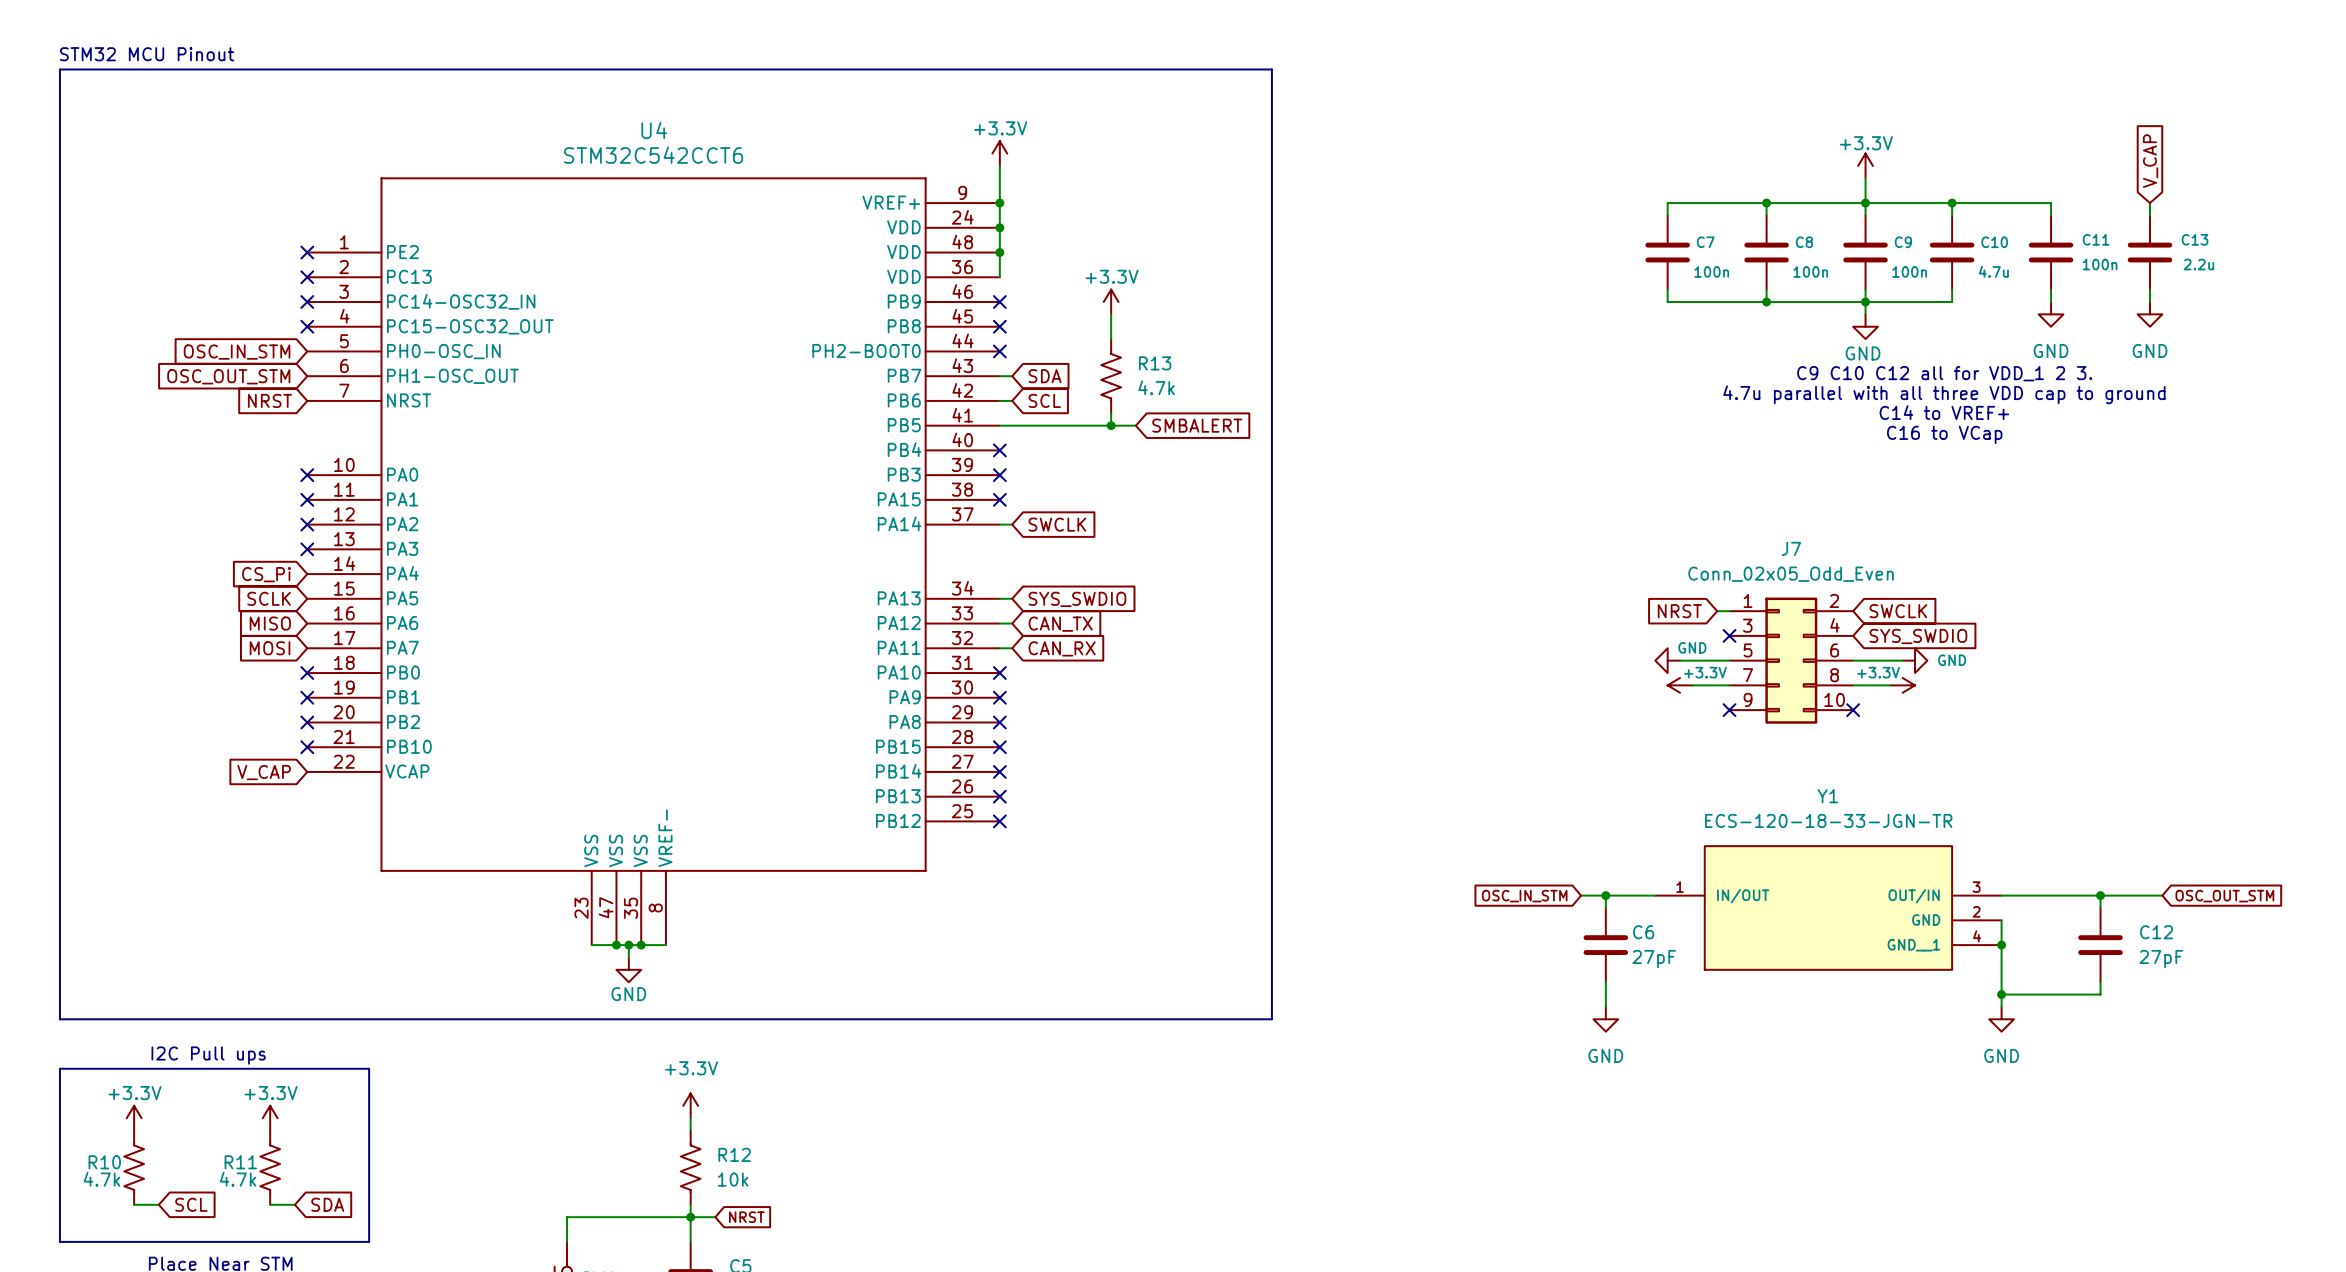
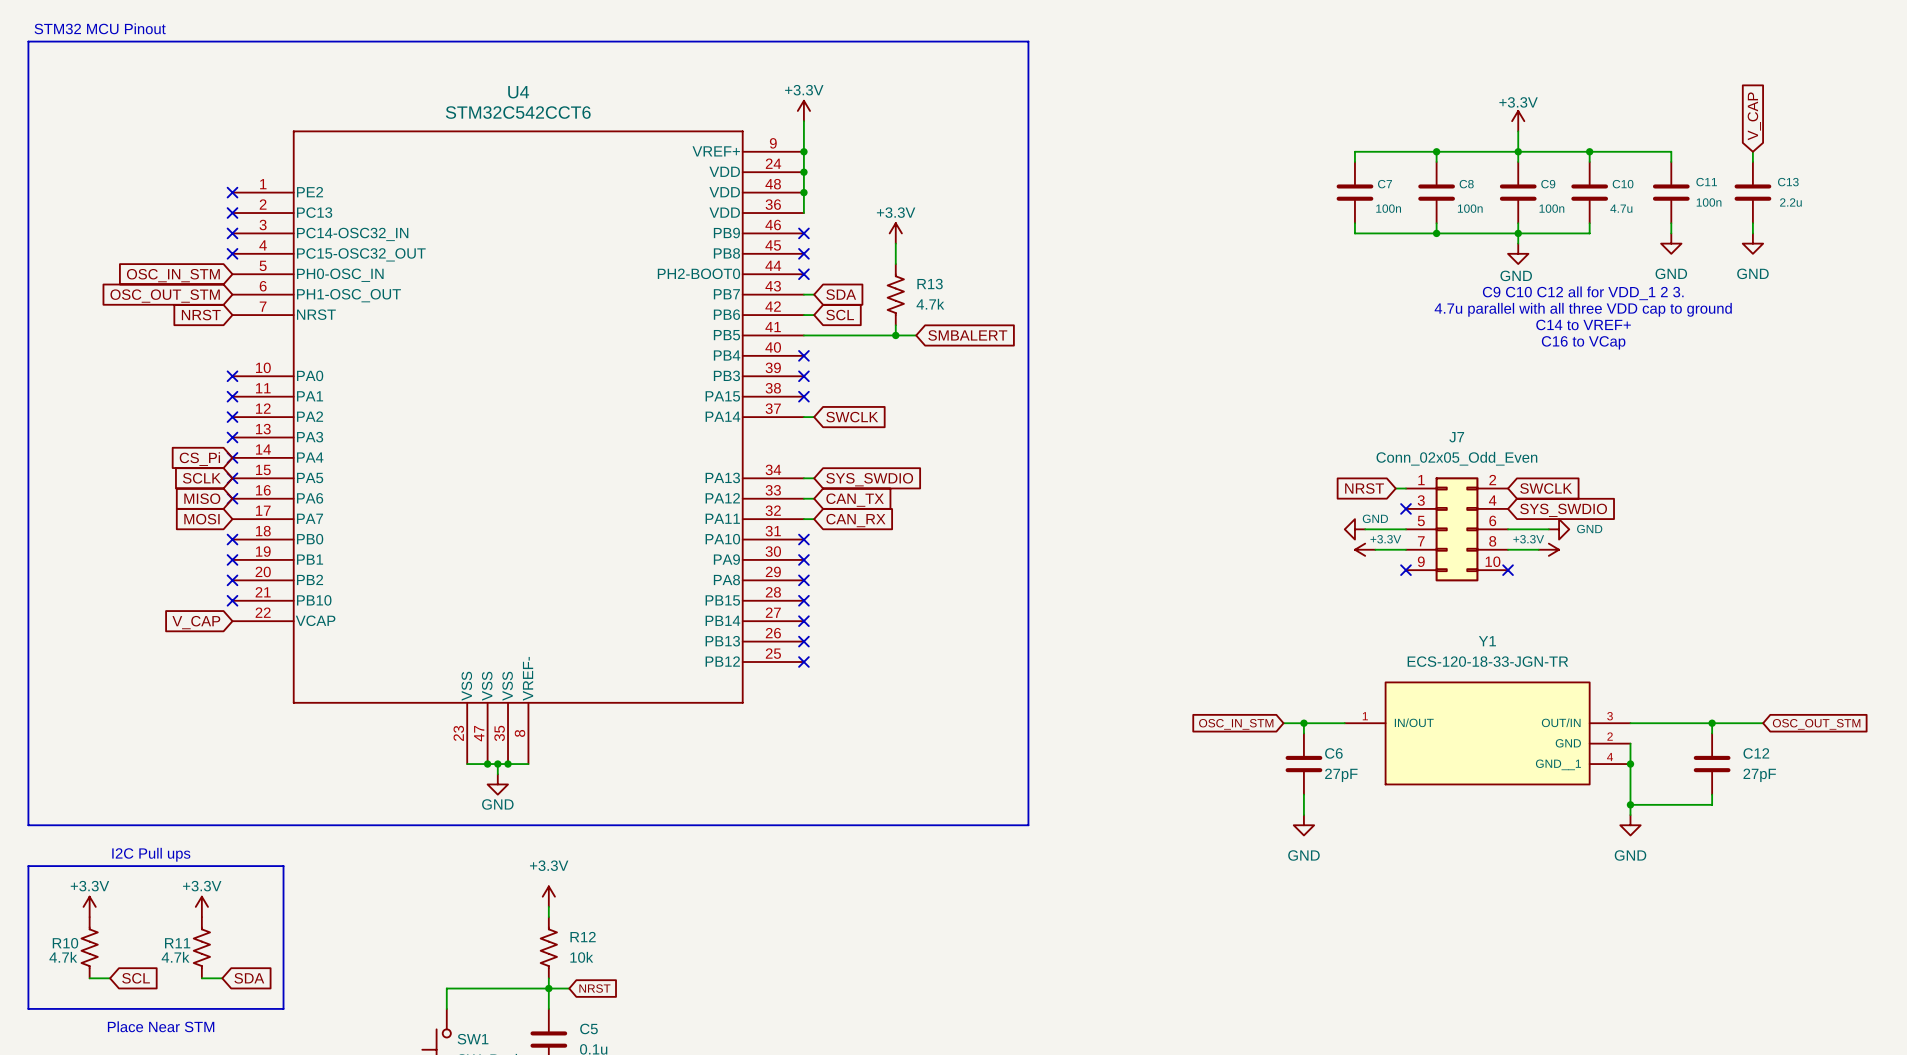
no-connect mark: none -> (232, 457)
no-connect mark: none -> (232, 478)
no-connect mark: none -> (232, 498)

